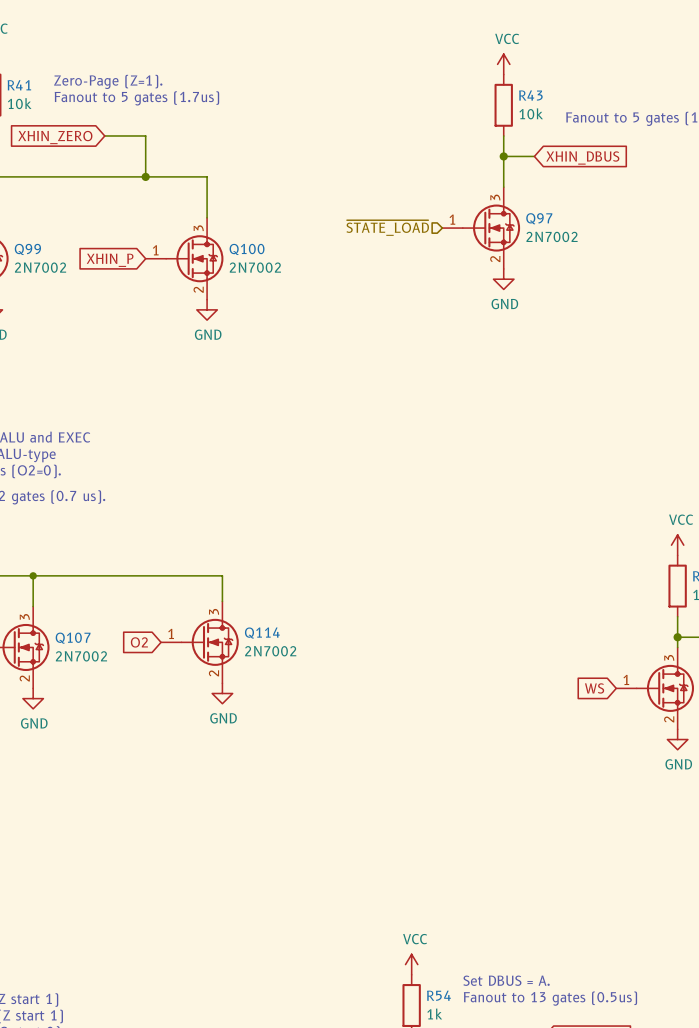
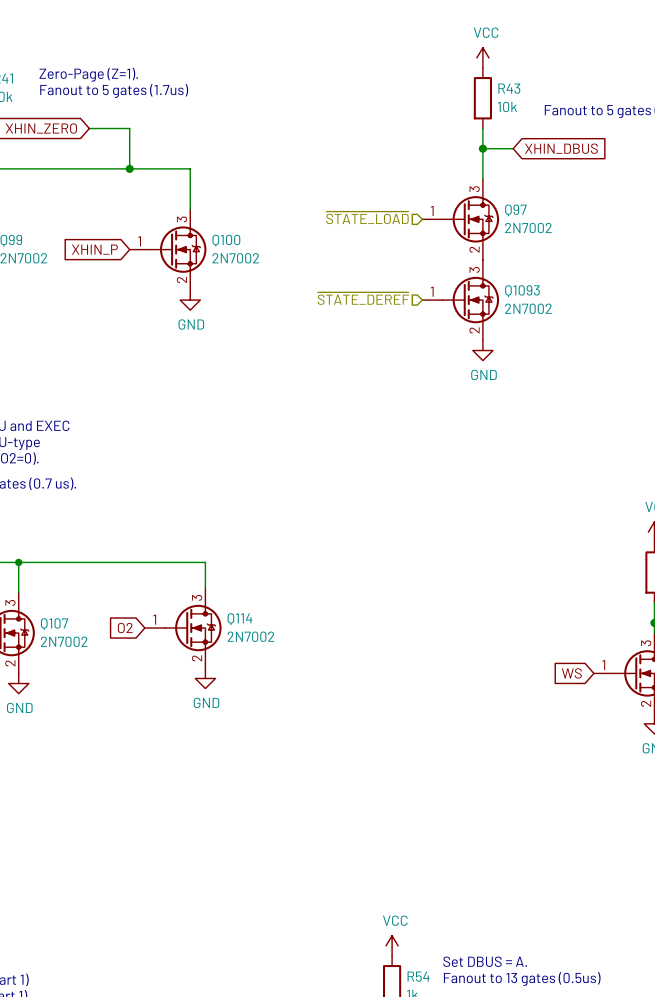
power symbol position: GND (503, 279) -> GND (482, 350)
hierarchical label: none -> ~{STATE_DEREF} (363, 298)
Q1093: none -> 2N7002 (460, 300)

